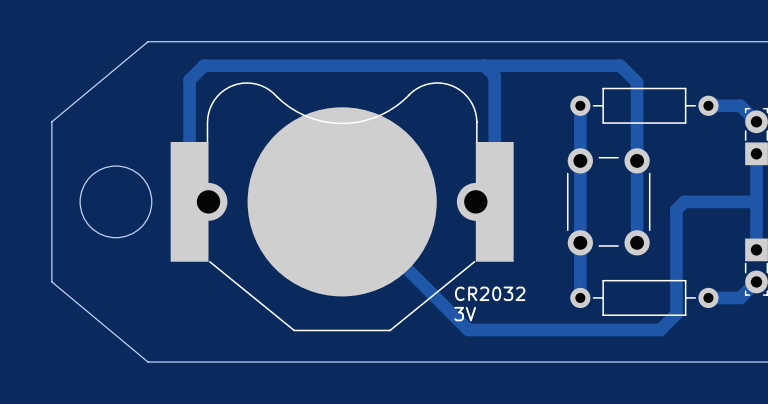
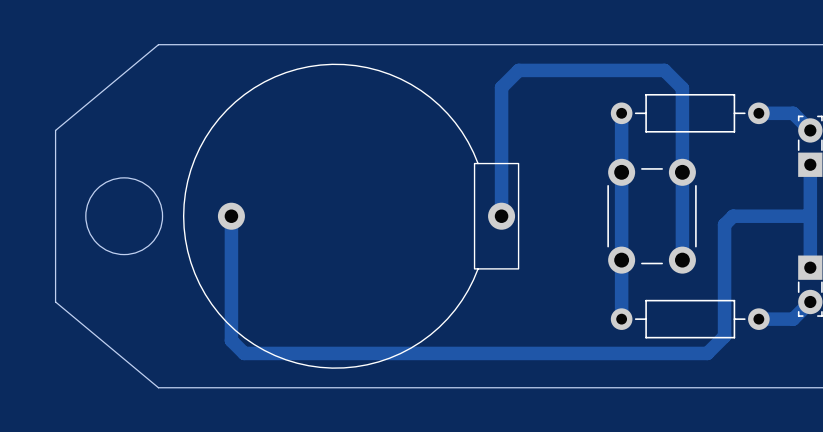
track: none -> (518, 70) (501, 87) (501, 216)
track: (189, 201) (189, 80) (204, 65) (484, 65) (494, 76) (494, 201) -> none
part: none -> (351, 216)
track: (342, 201) (468, 329) -> (231, 216) (231, 340) (244, 353) (501, 353)
part: (342, 206) -> none
text: CR2032 (490, 293) -> none
text: 3V (465, 314) -> none

